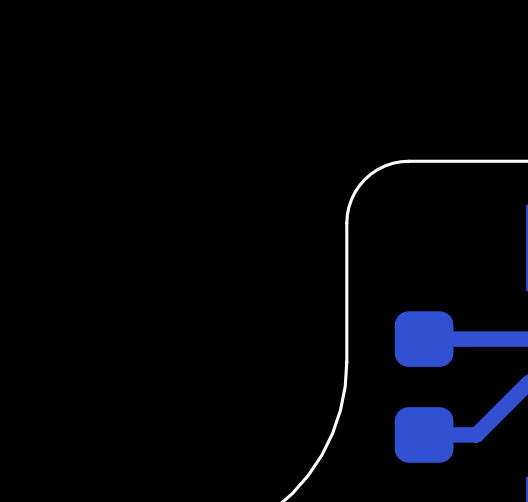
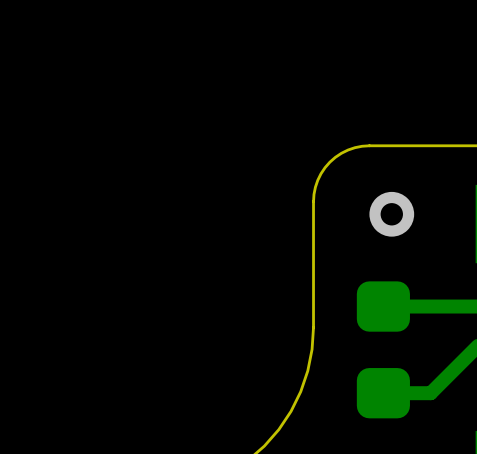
via: none -> (391, 214)

